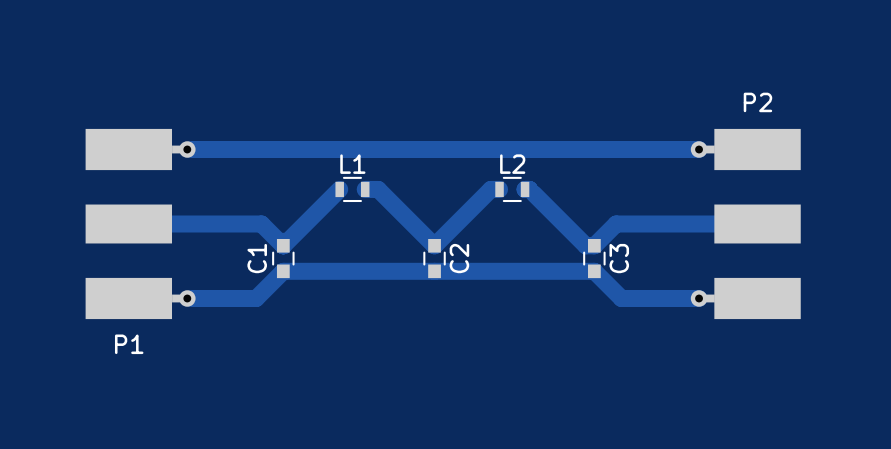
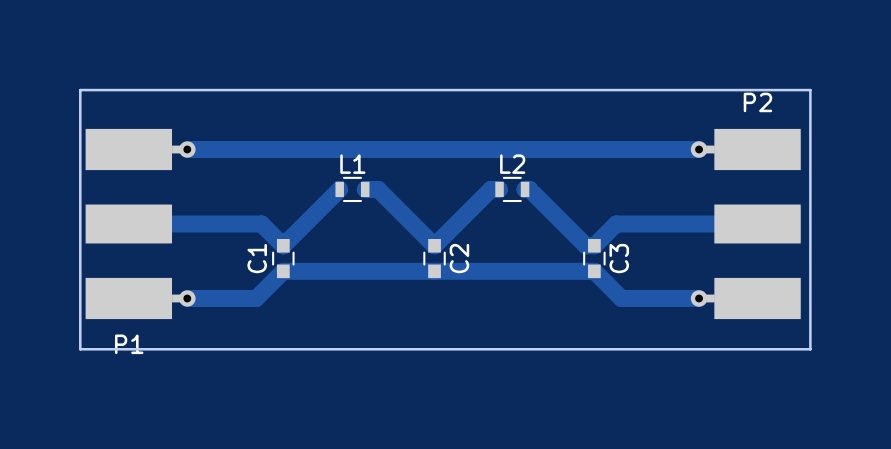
board edge: none -> (80, 90) (810, 90) (810, 349) (80, 349) (80, 90)

